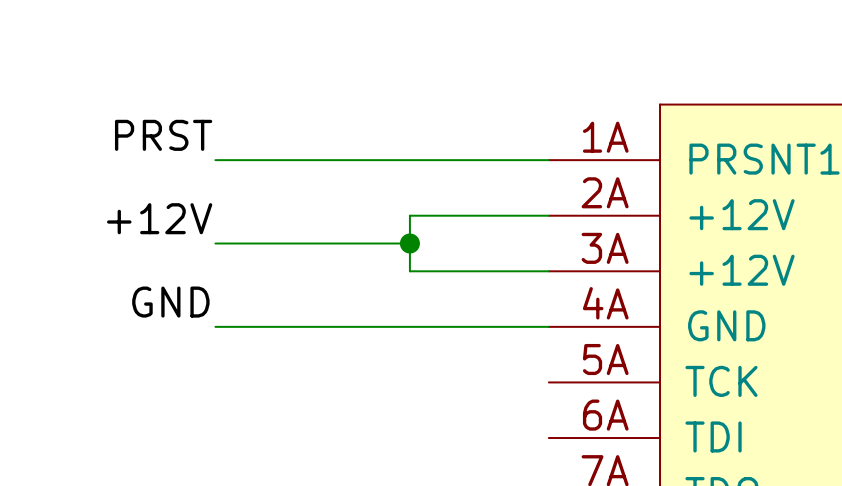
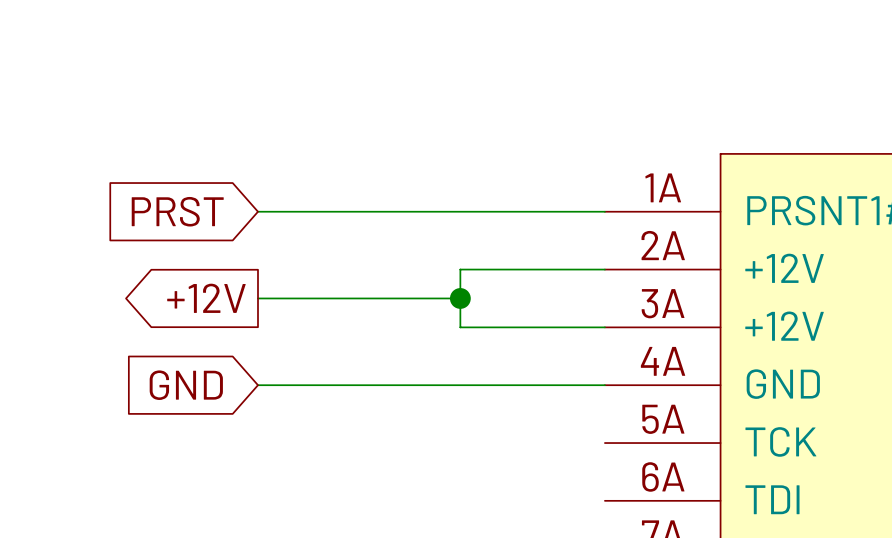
label: PRST (163, 135) -> none
global label: none -> PRST (177, 211)
label: +12V (159, 218) -> none
global label: none -> +12V (206, 298)
label: GND (170, 302) -> none
global label: none -> GND (186, 385)

